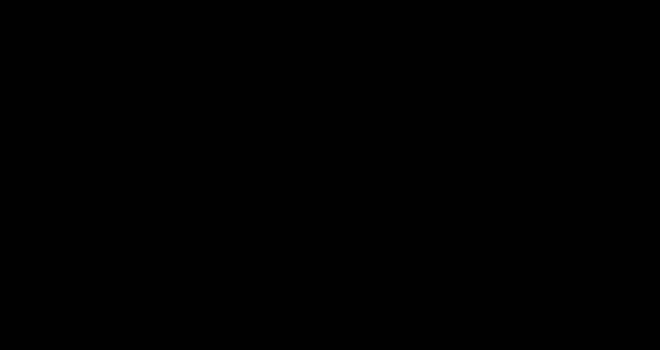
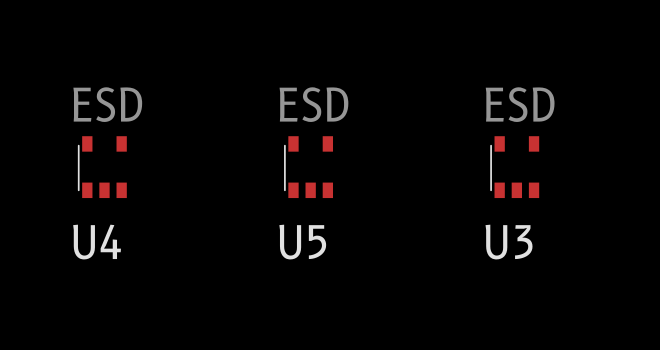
U4: none -> ESD (102, 167)
U5: none -> ESD (308, 167)
U3: none -> ESD (514, 167)

